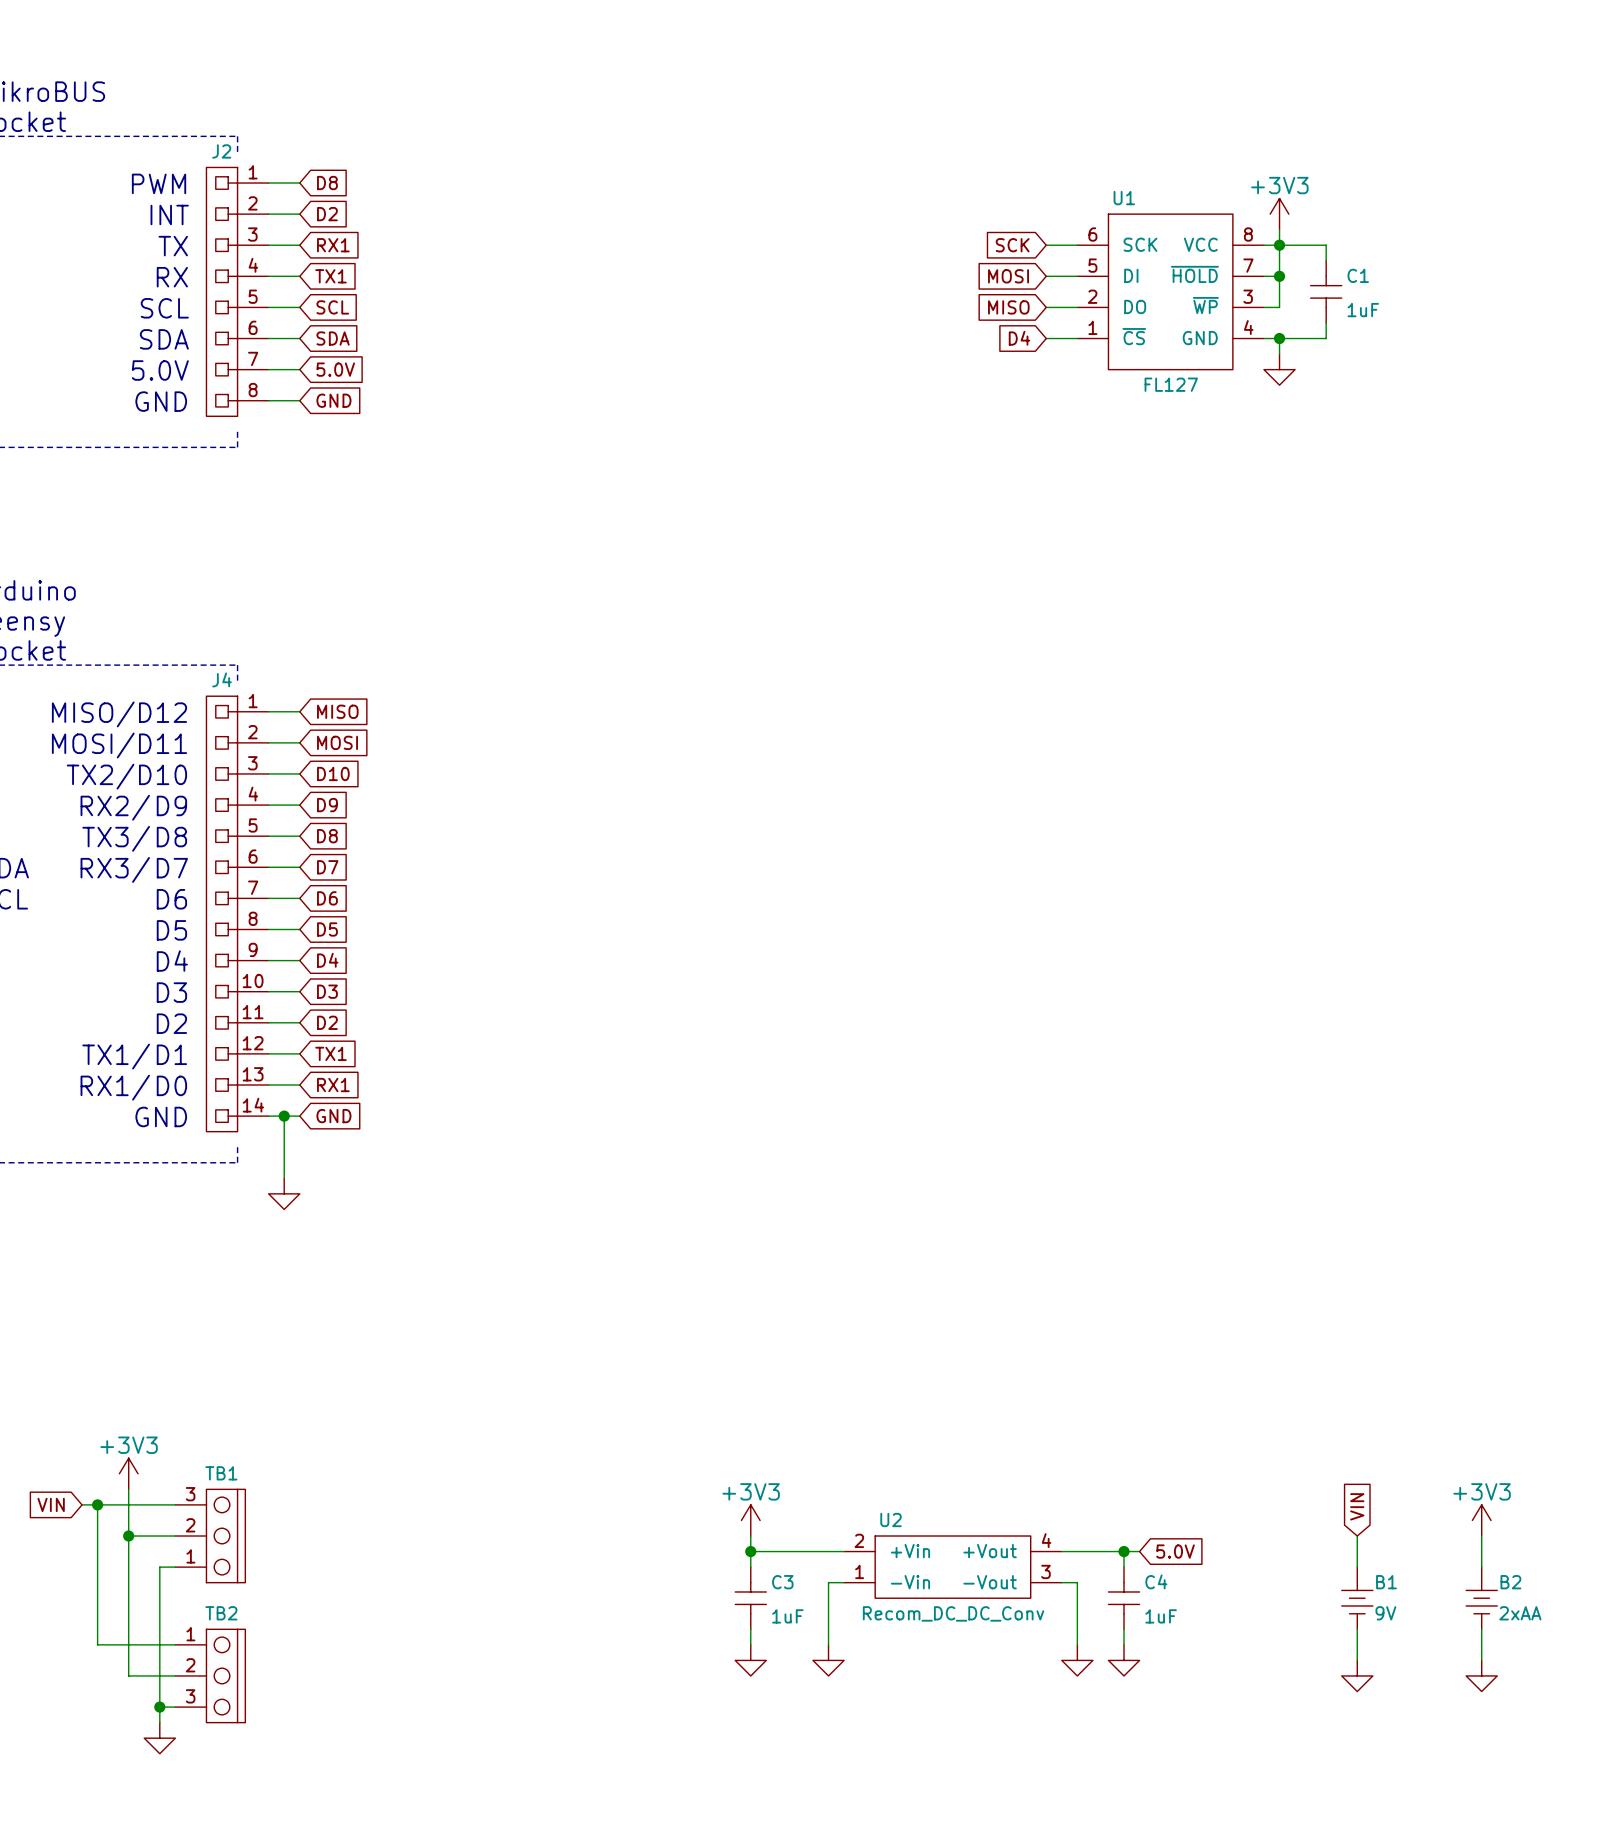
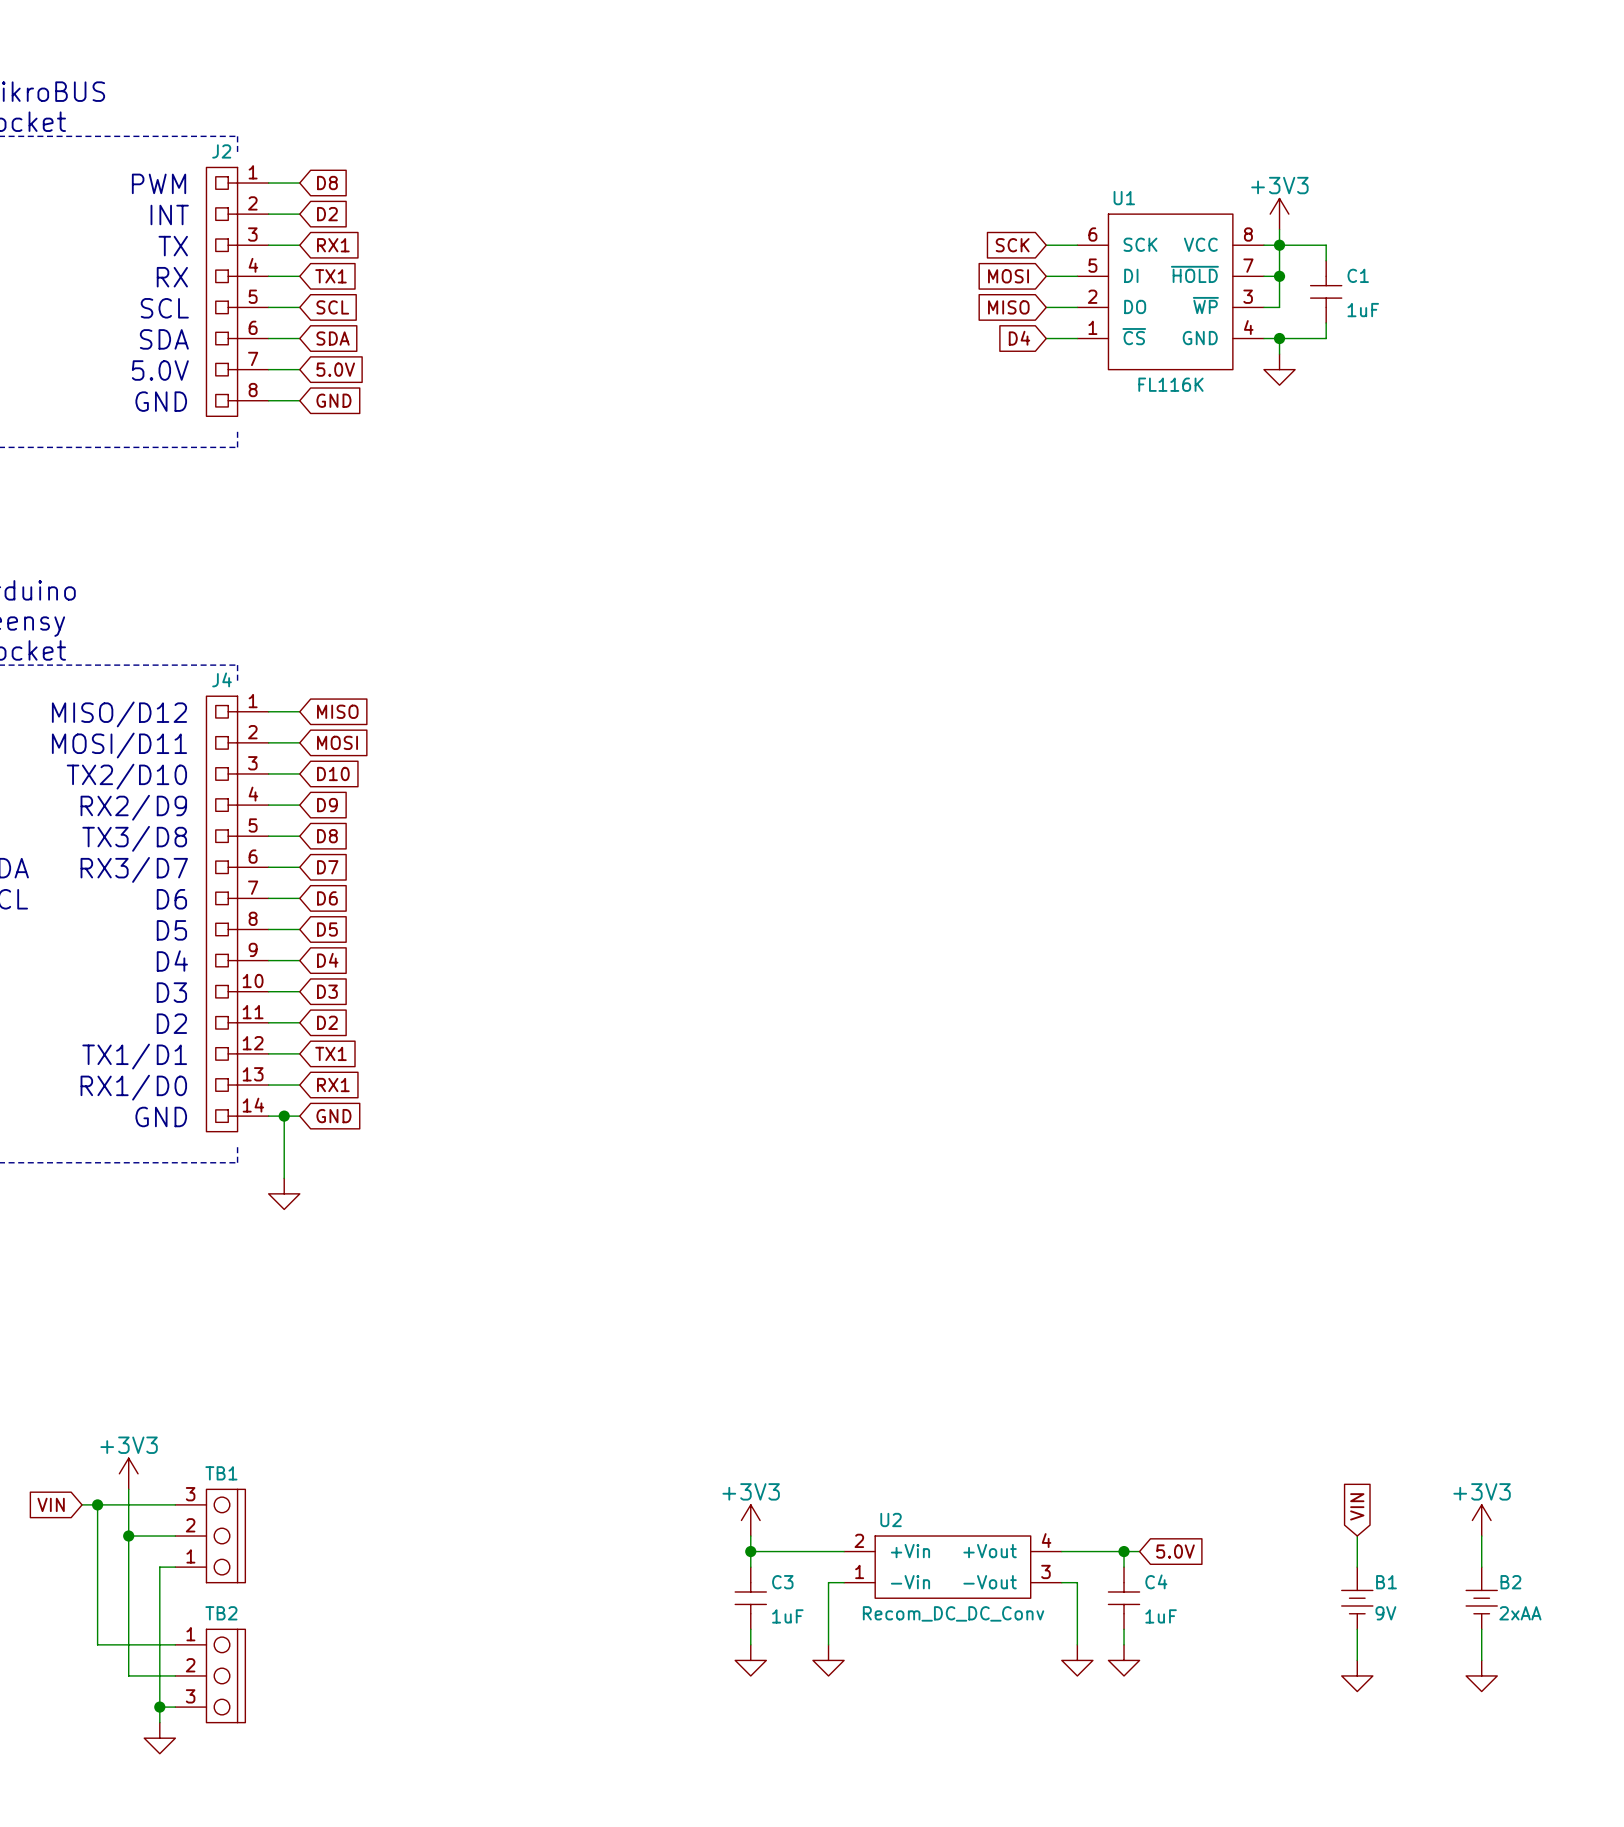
U1 value: FL127 (1171, 384) -> FL116K (1170, 384)

